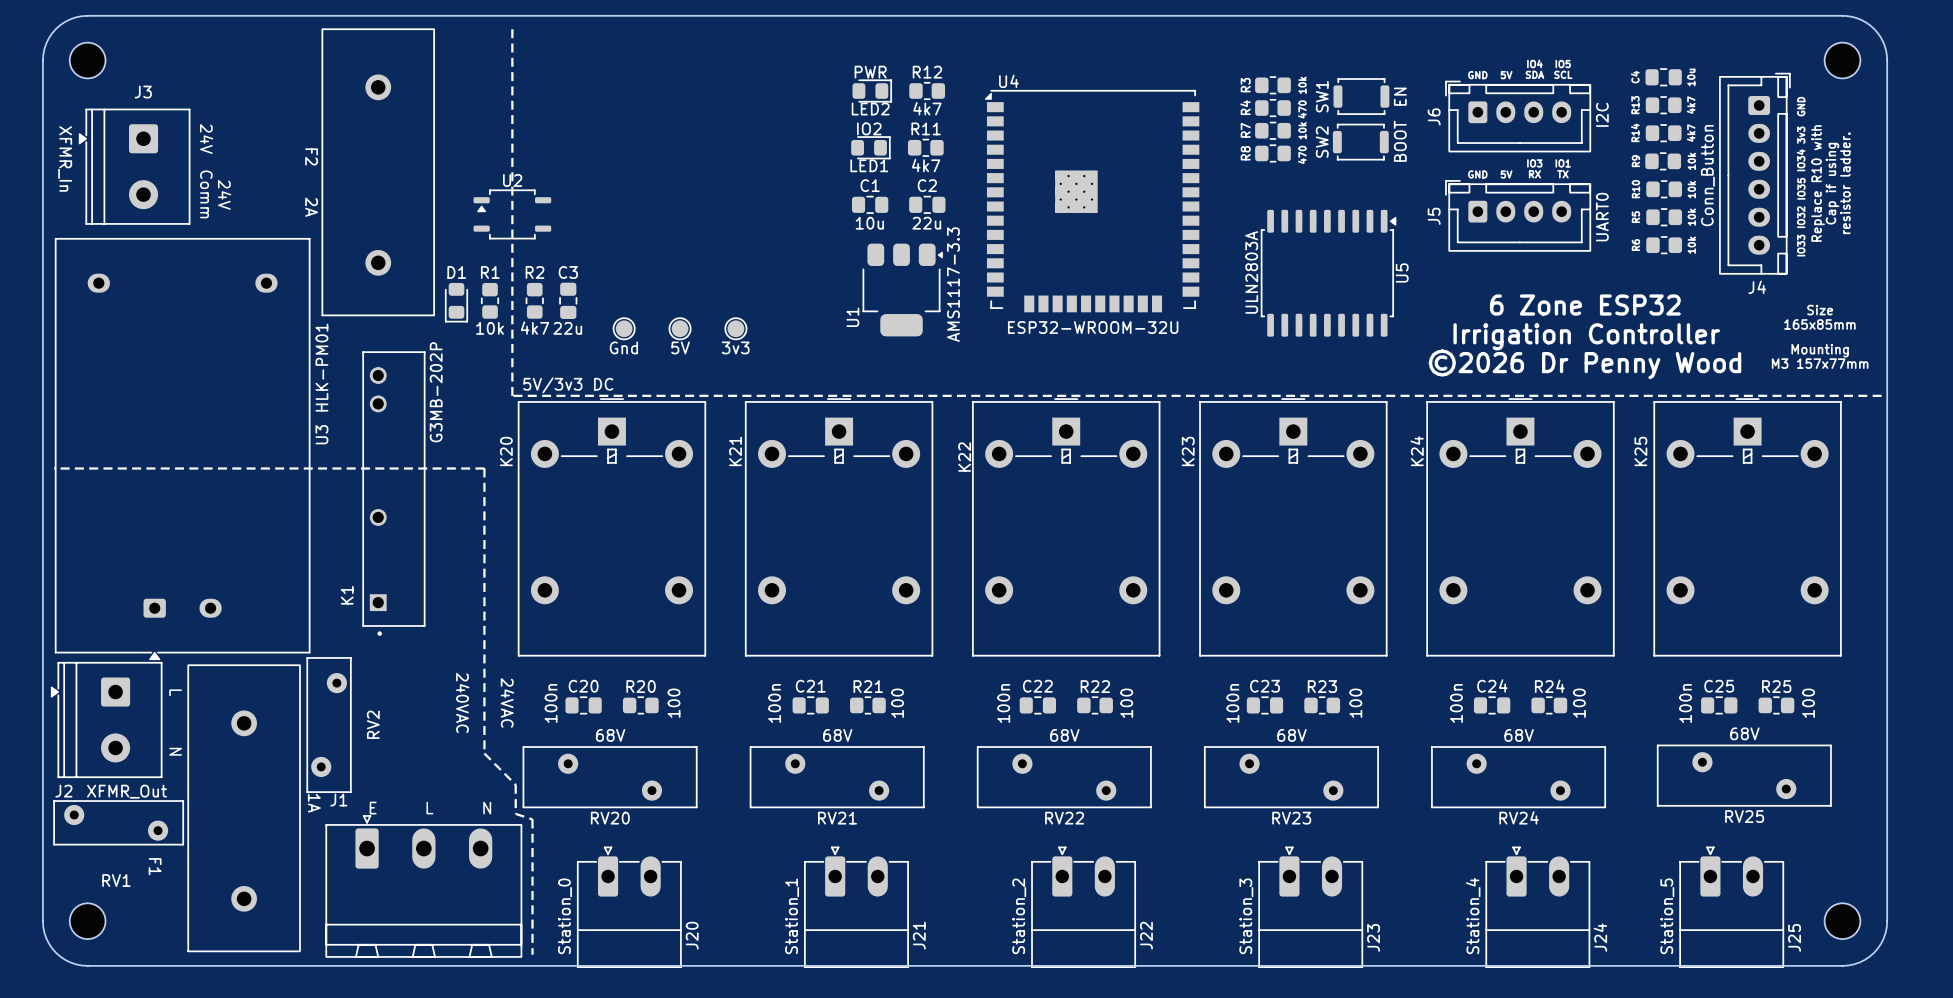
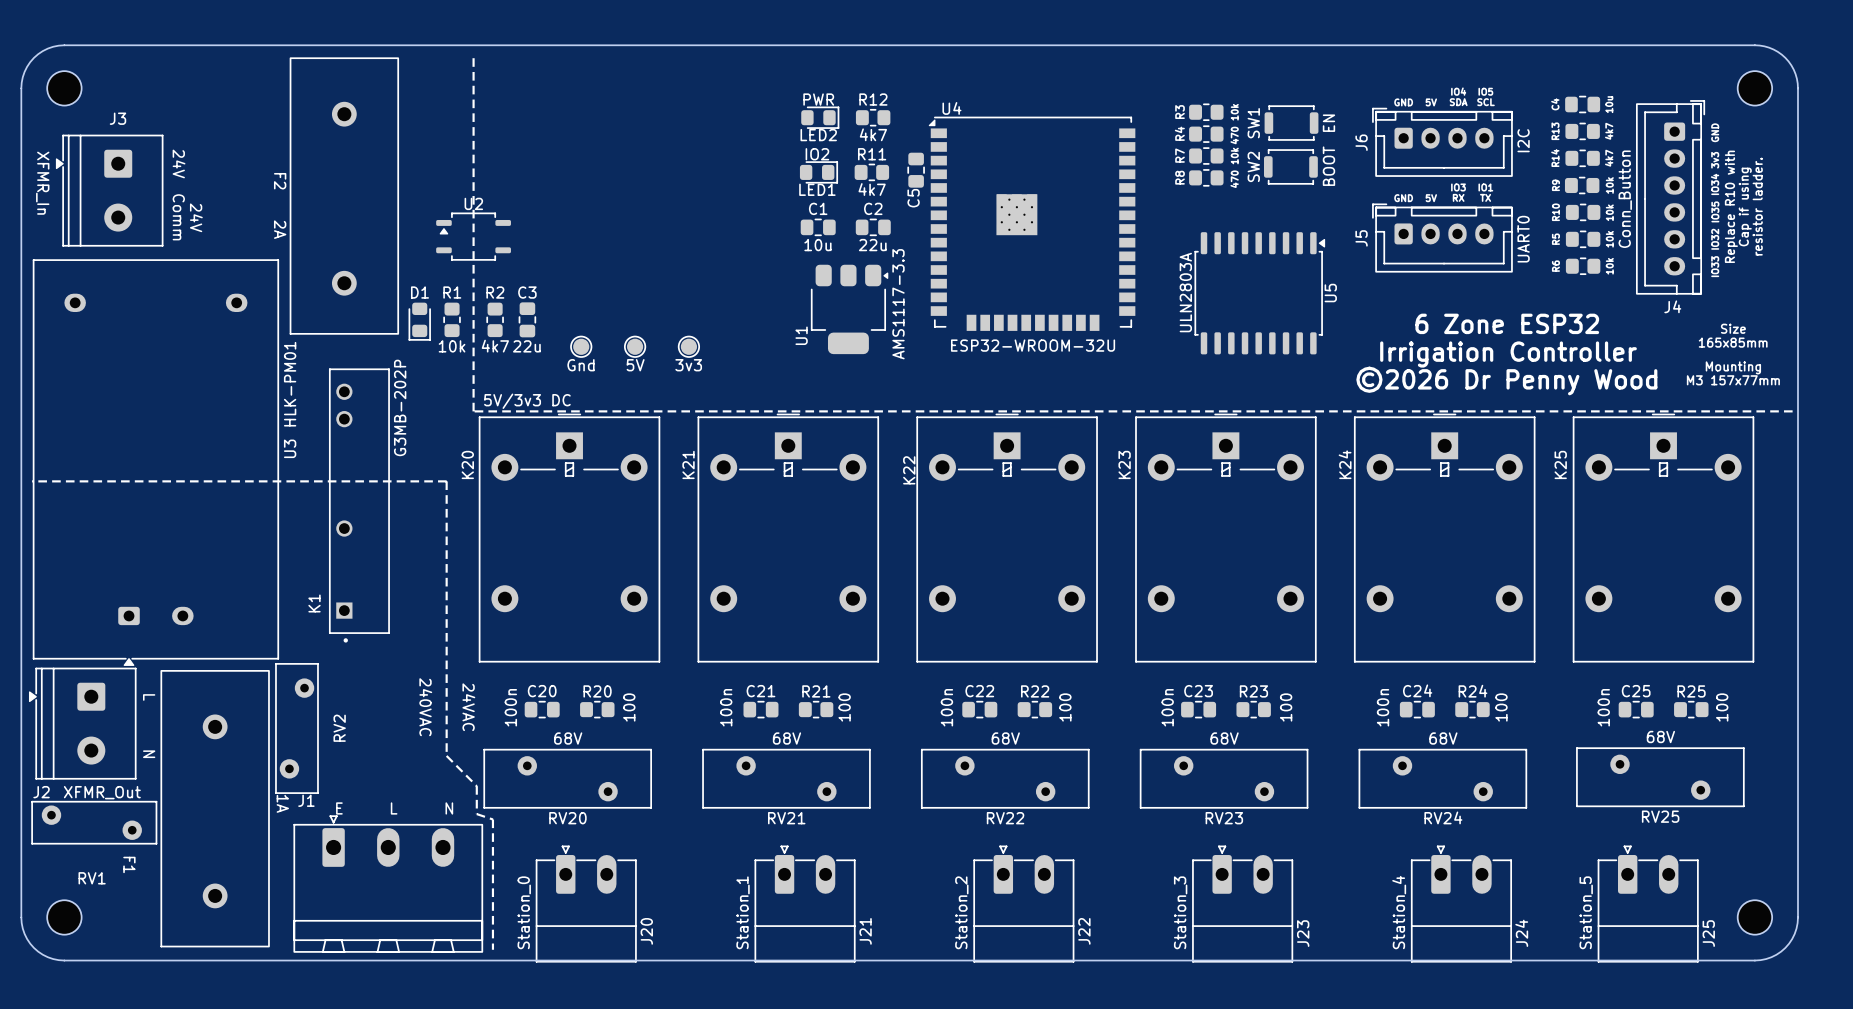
C5: none -> (916, 170)

